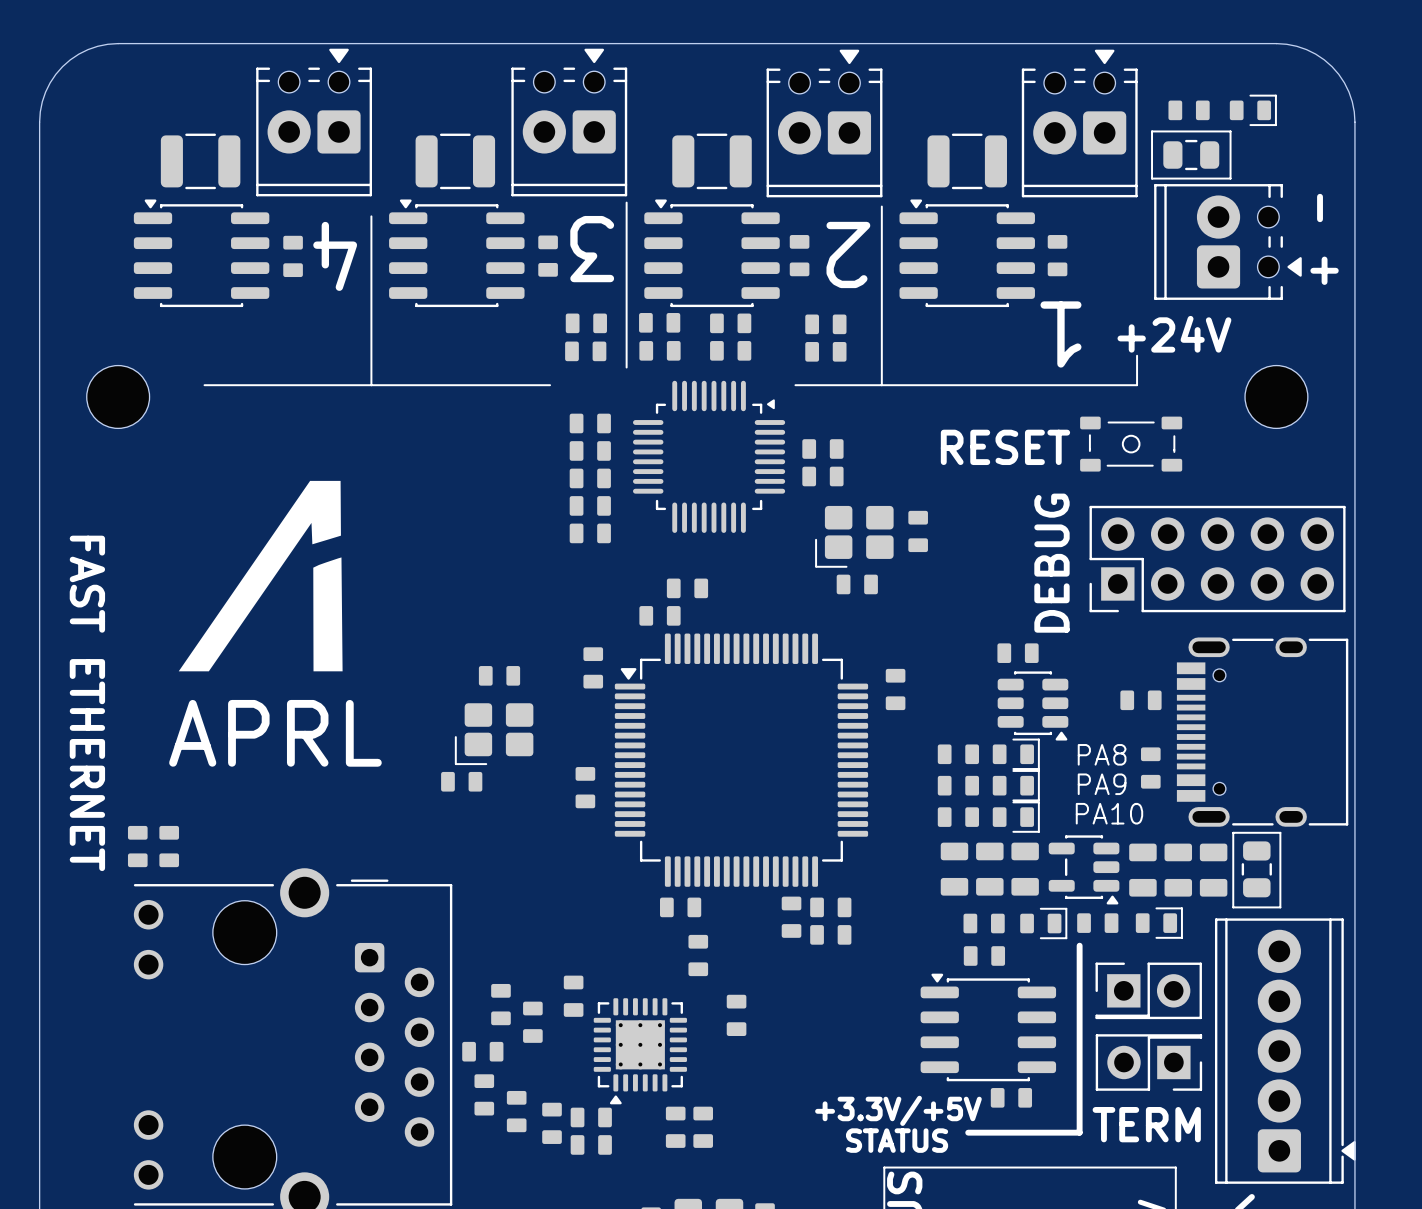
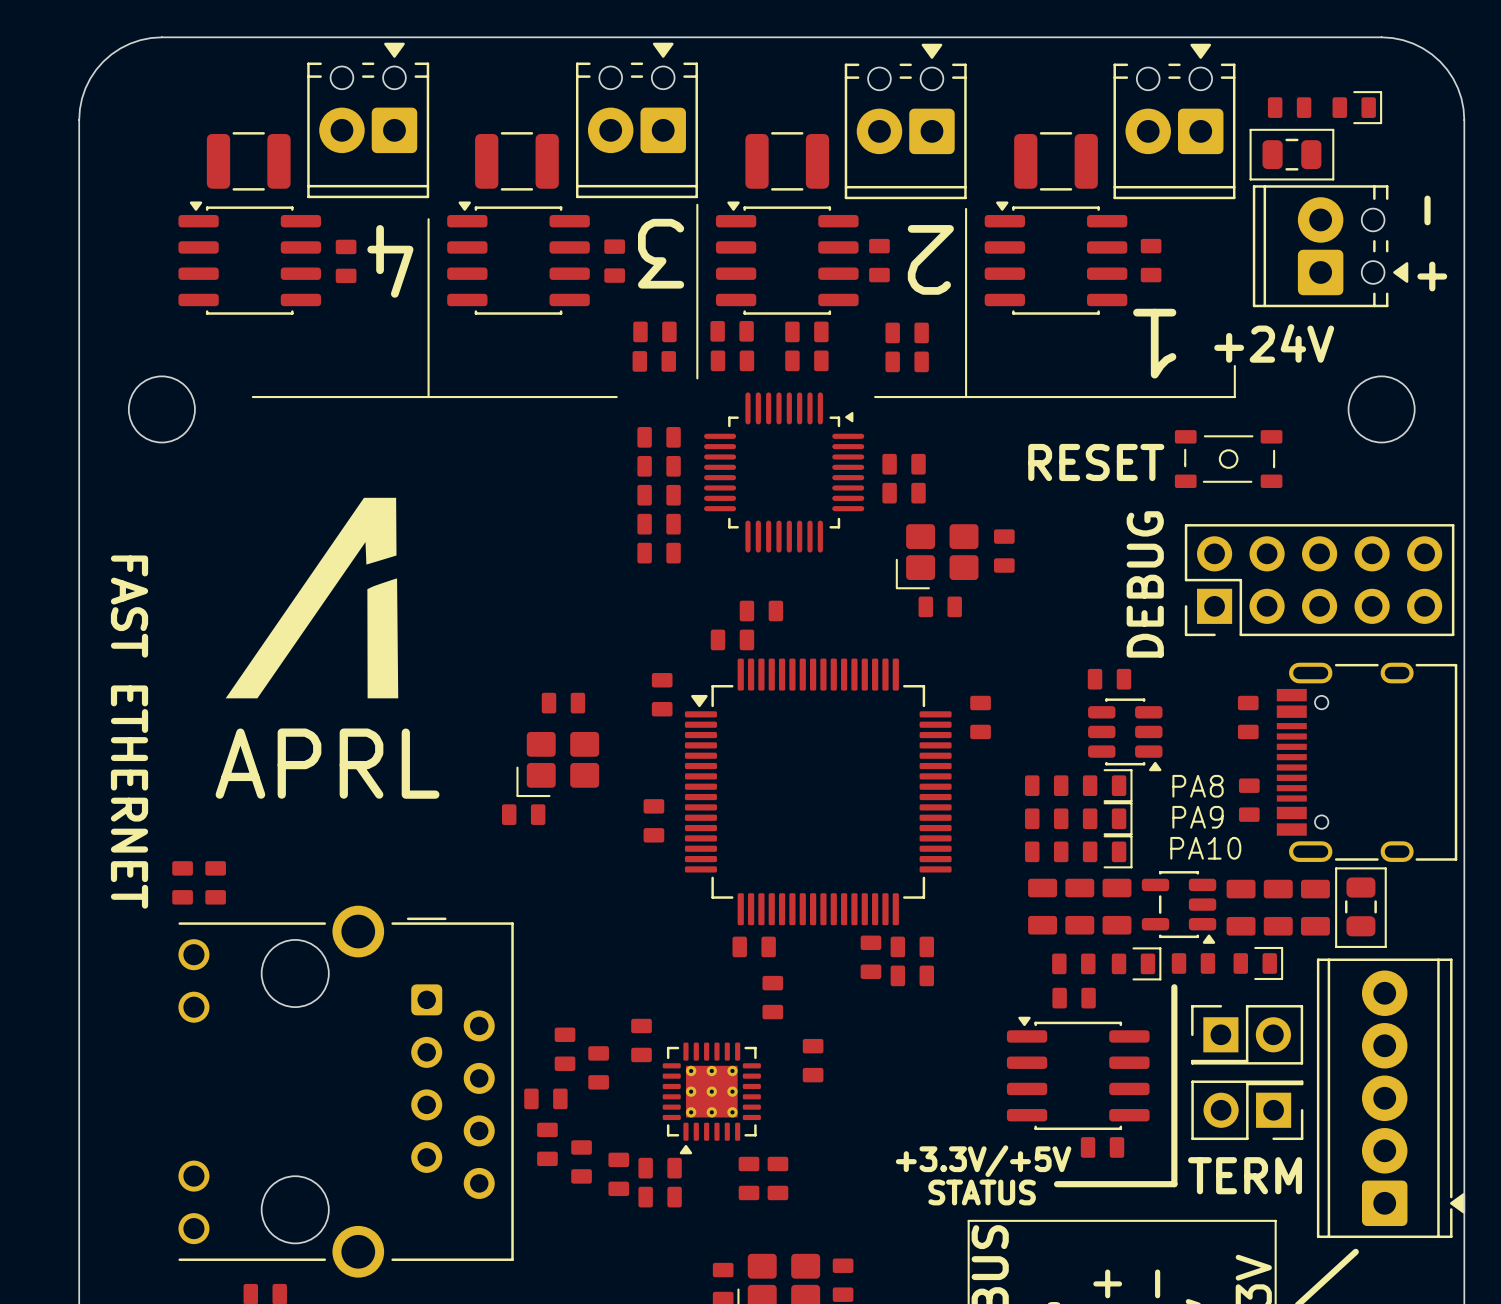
part rotation: 0° (1140, 700) -> 90° clockwise (1248, 717)

